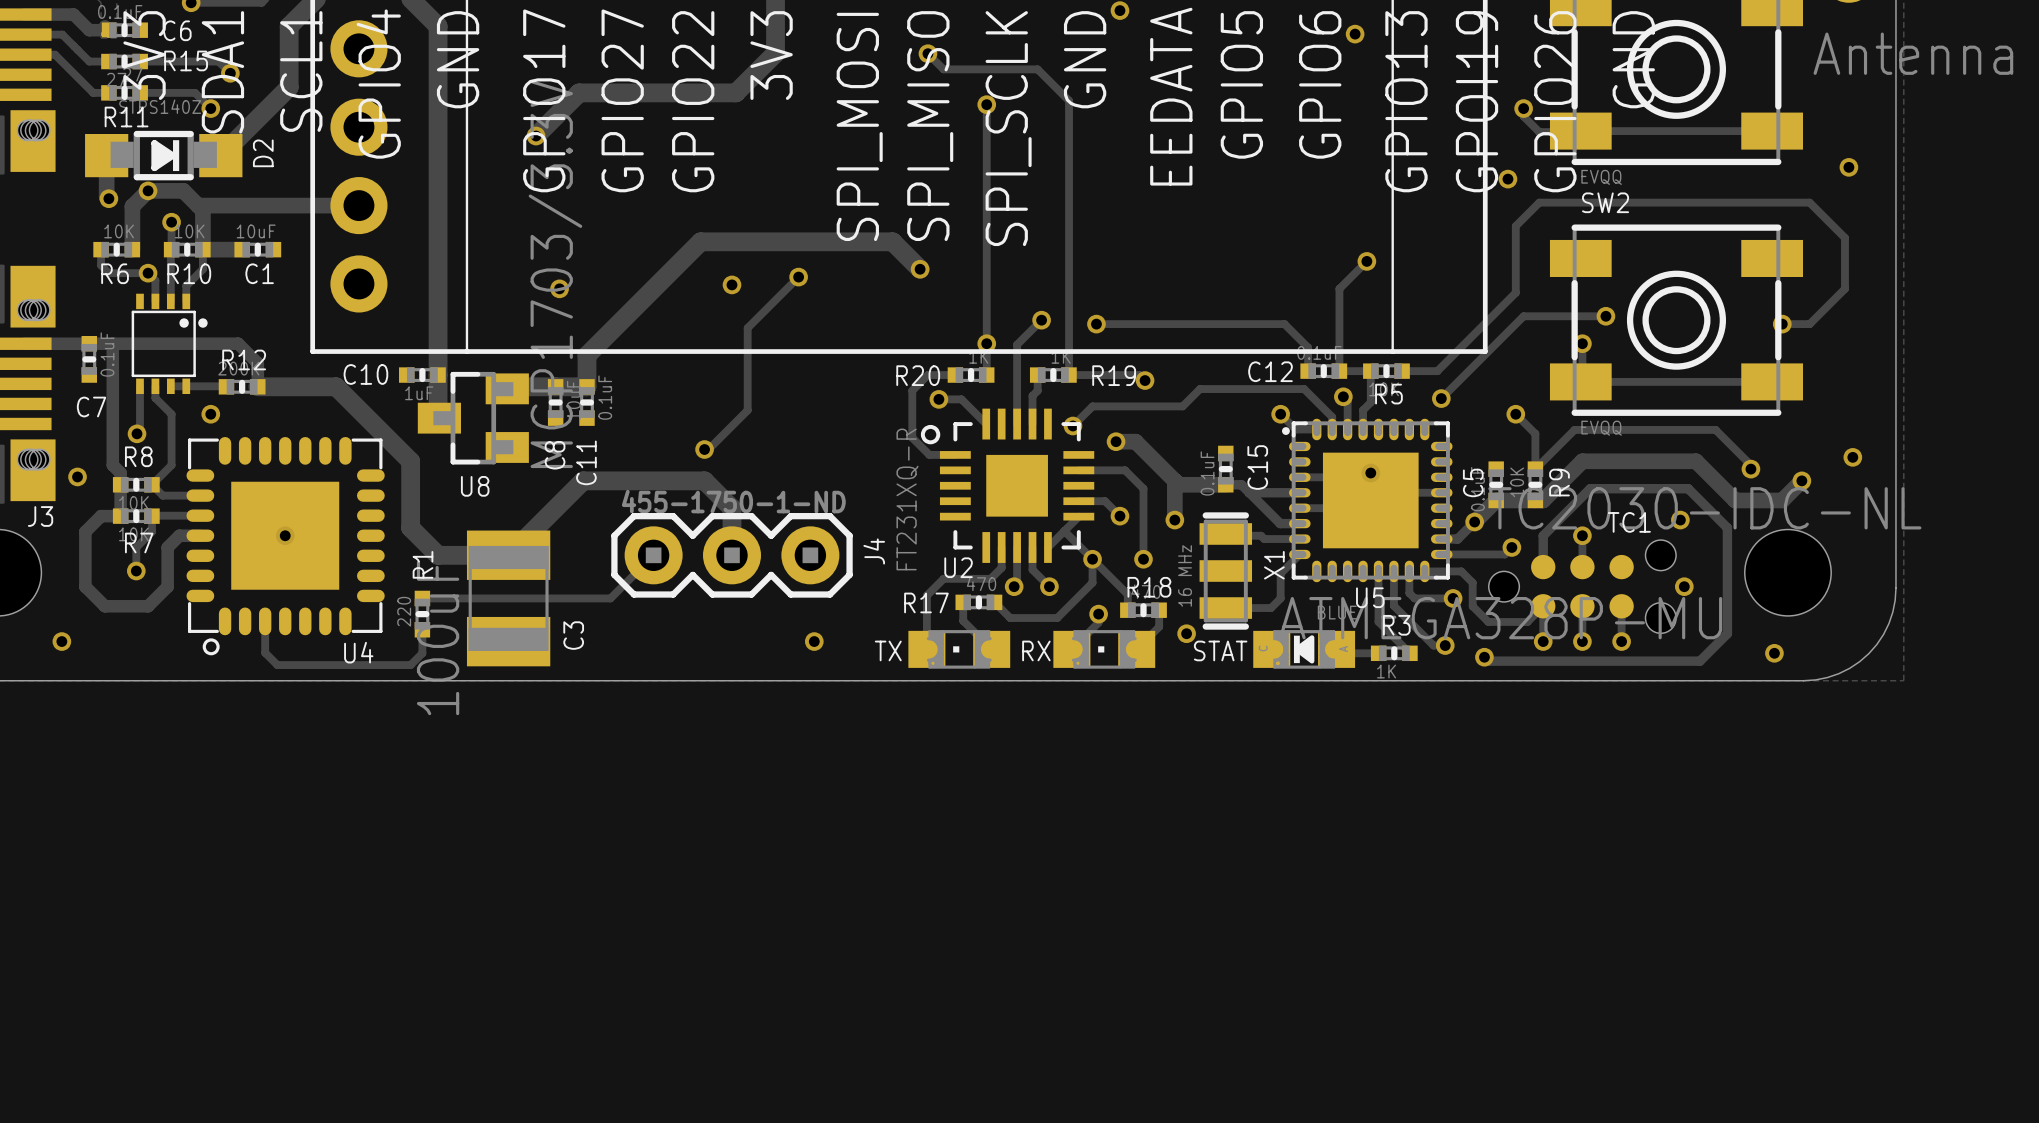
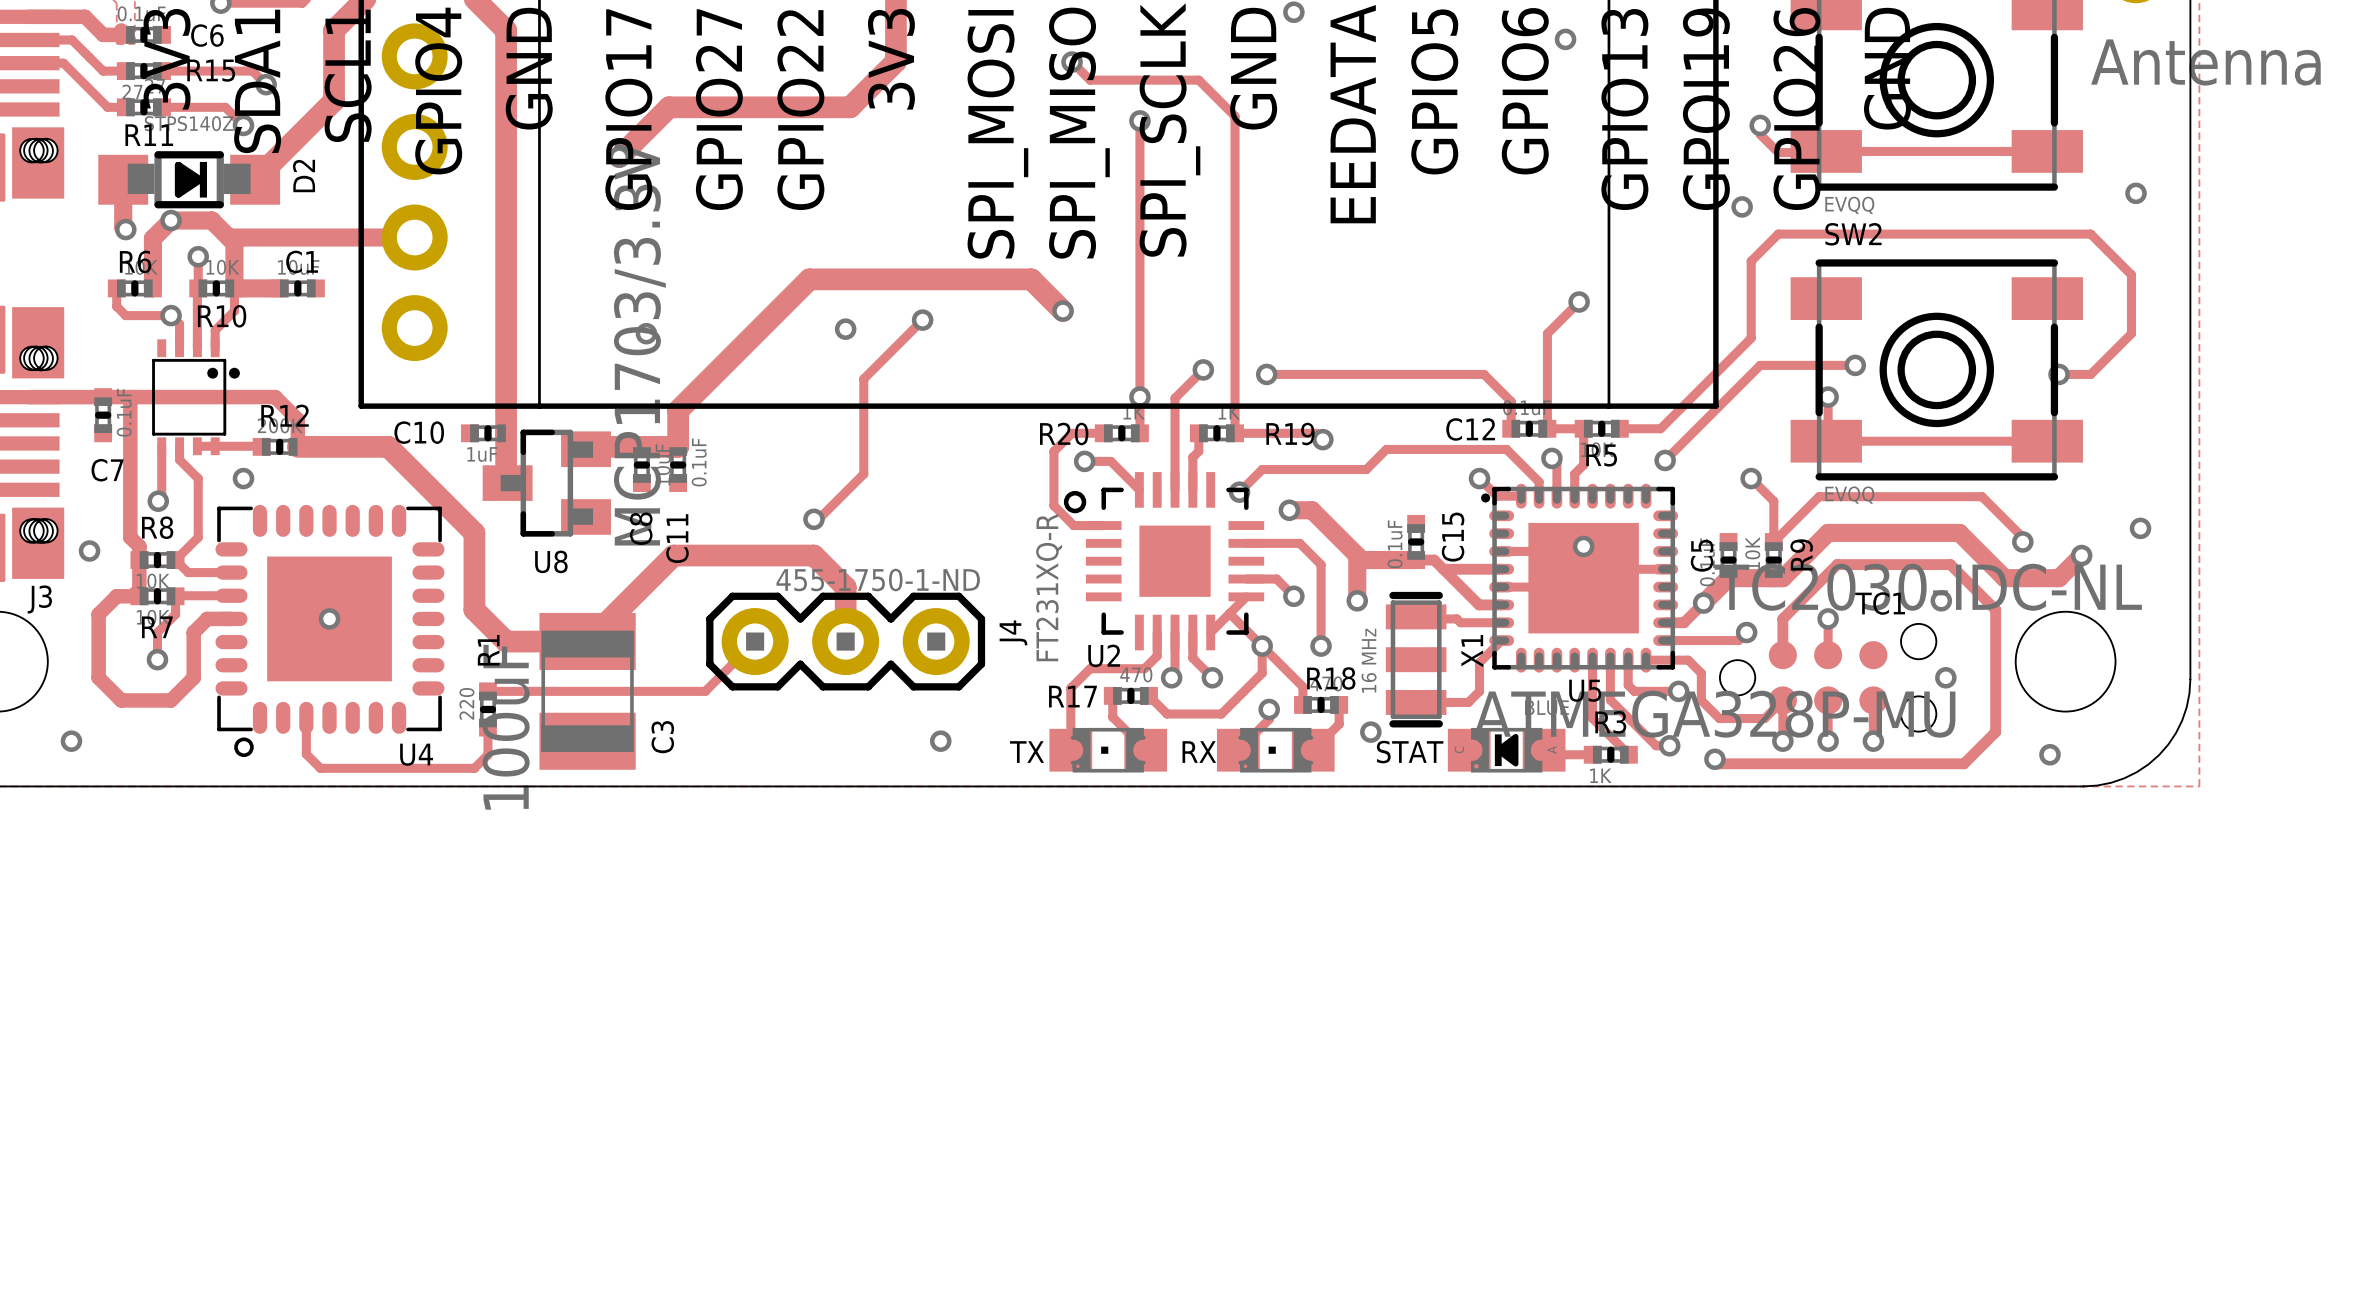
R6 name position: R6 (115, 273) -> R6 (135, 261)
C1 name position: C1 (259, 273) -> C1 (302, 261)

